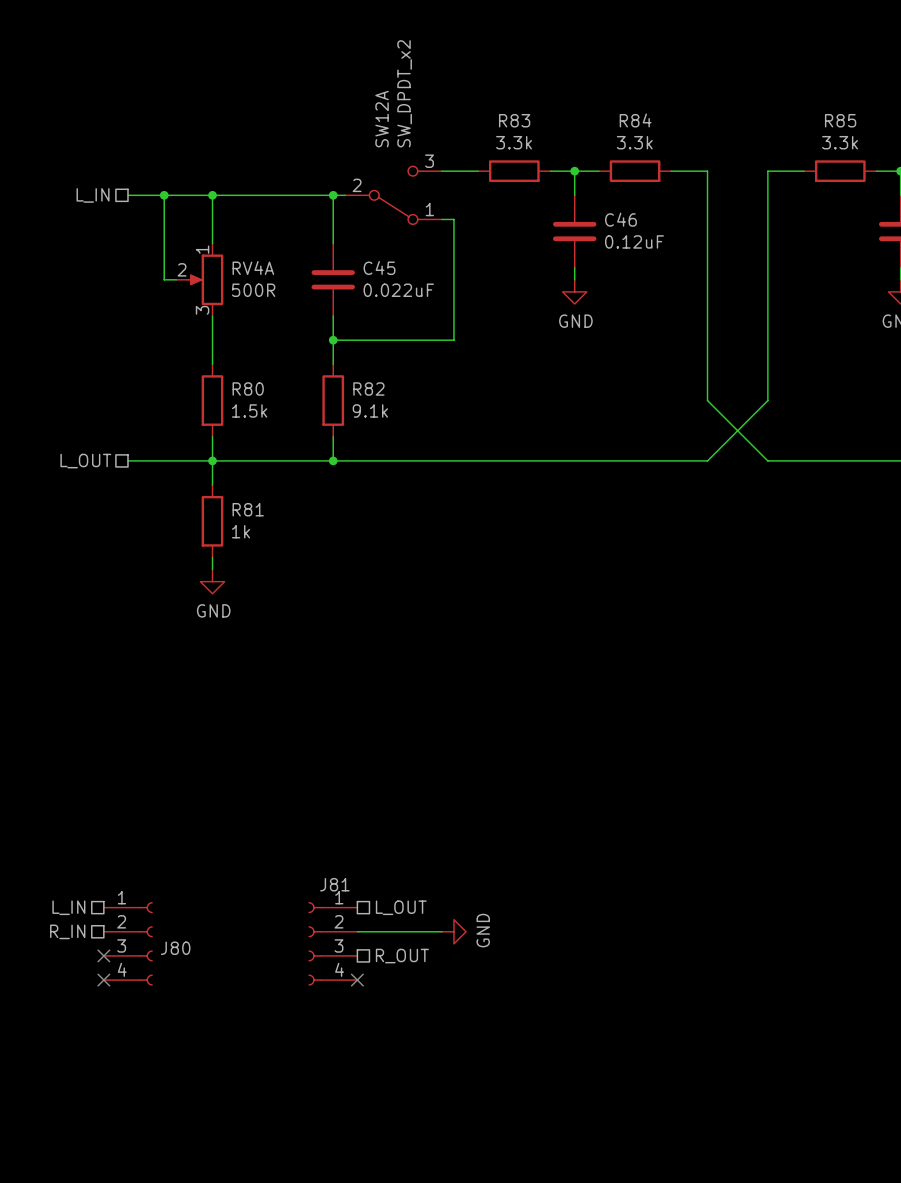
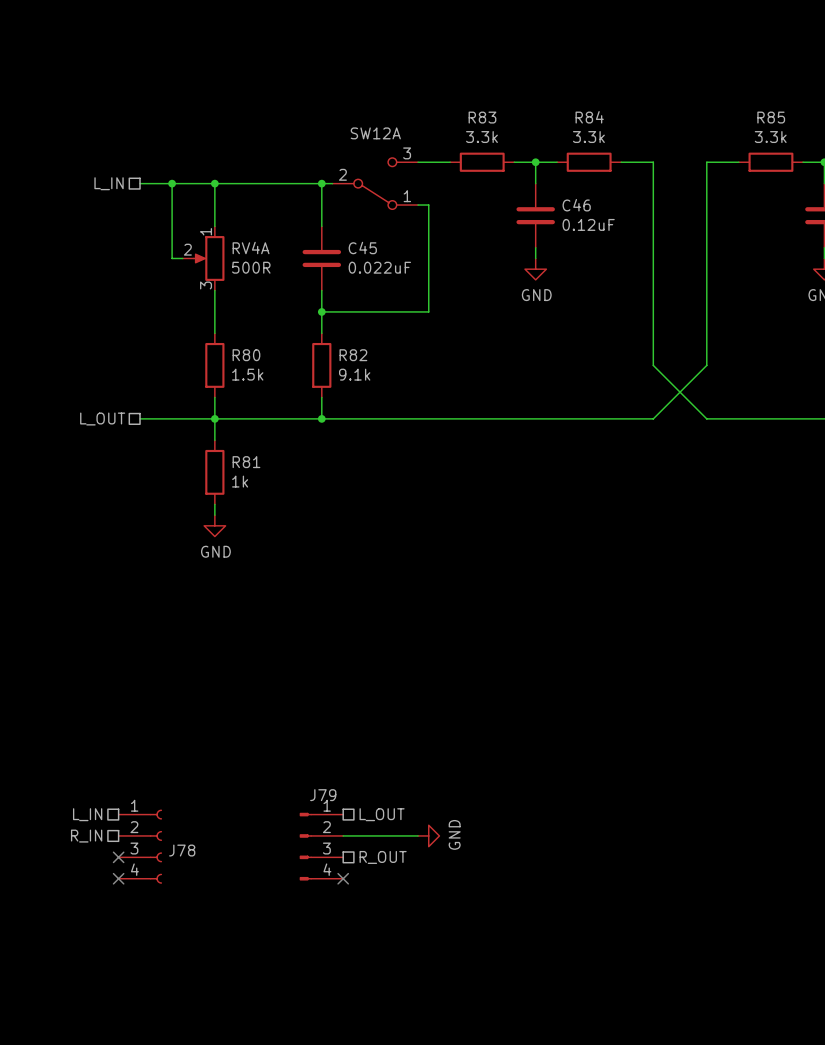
SW12A value: SW_DPDT_x2 (404, 93) -> none
SW12A name rotation: 0° (382, 119) -> 90° clockwise (375, 133)
J81: (332, 943) -> none
J79: none -> (321, 846)
J80 name: J80 (175, 948) -> J78 (182, 850)

